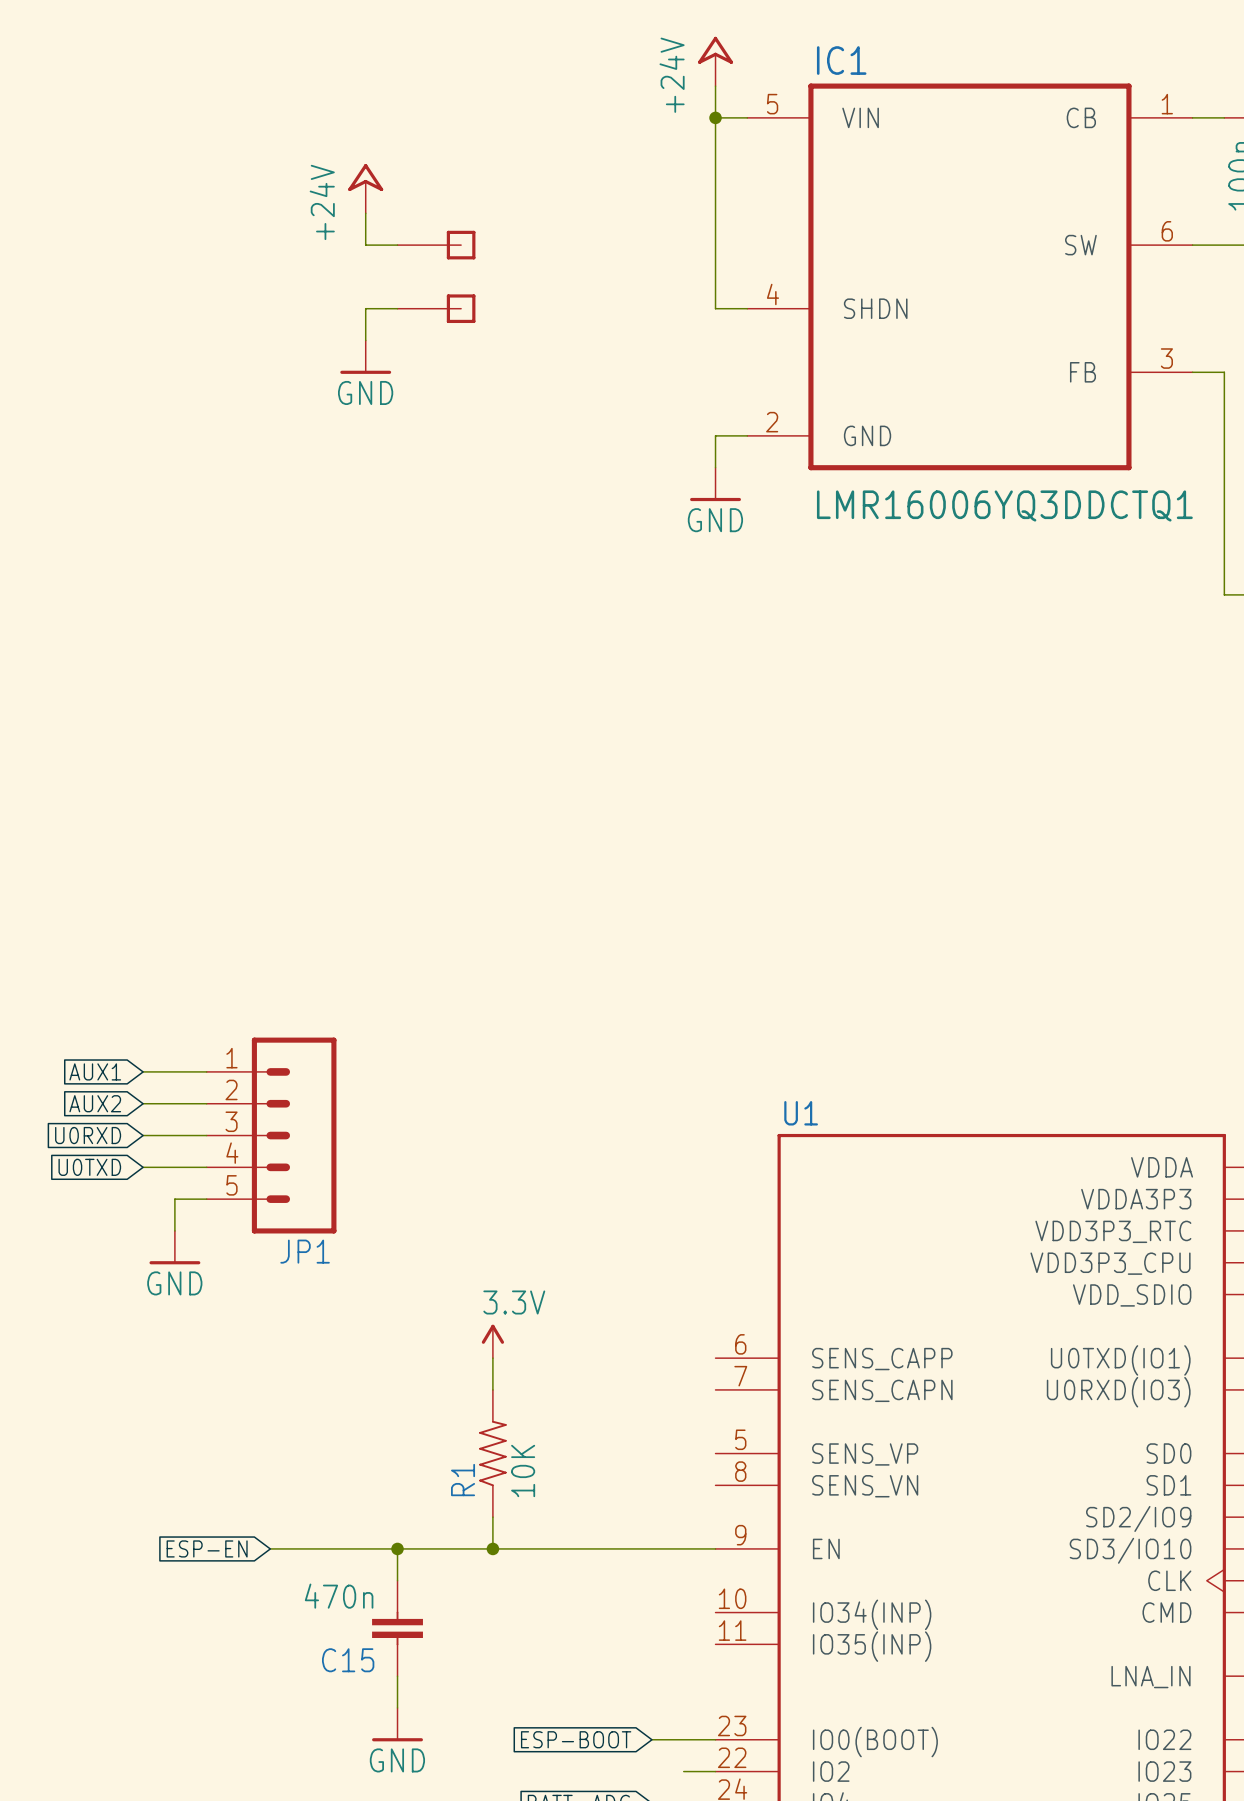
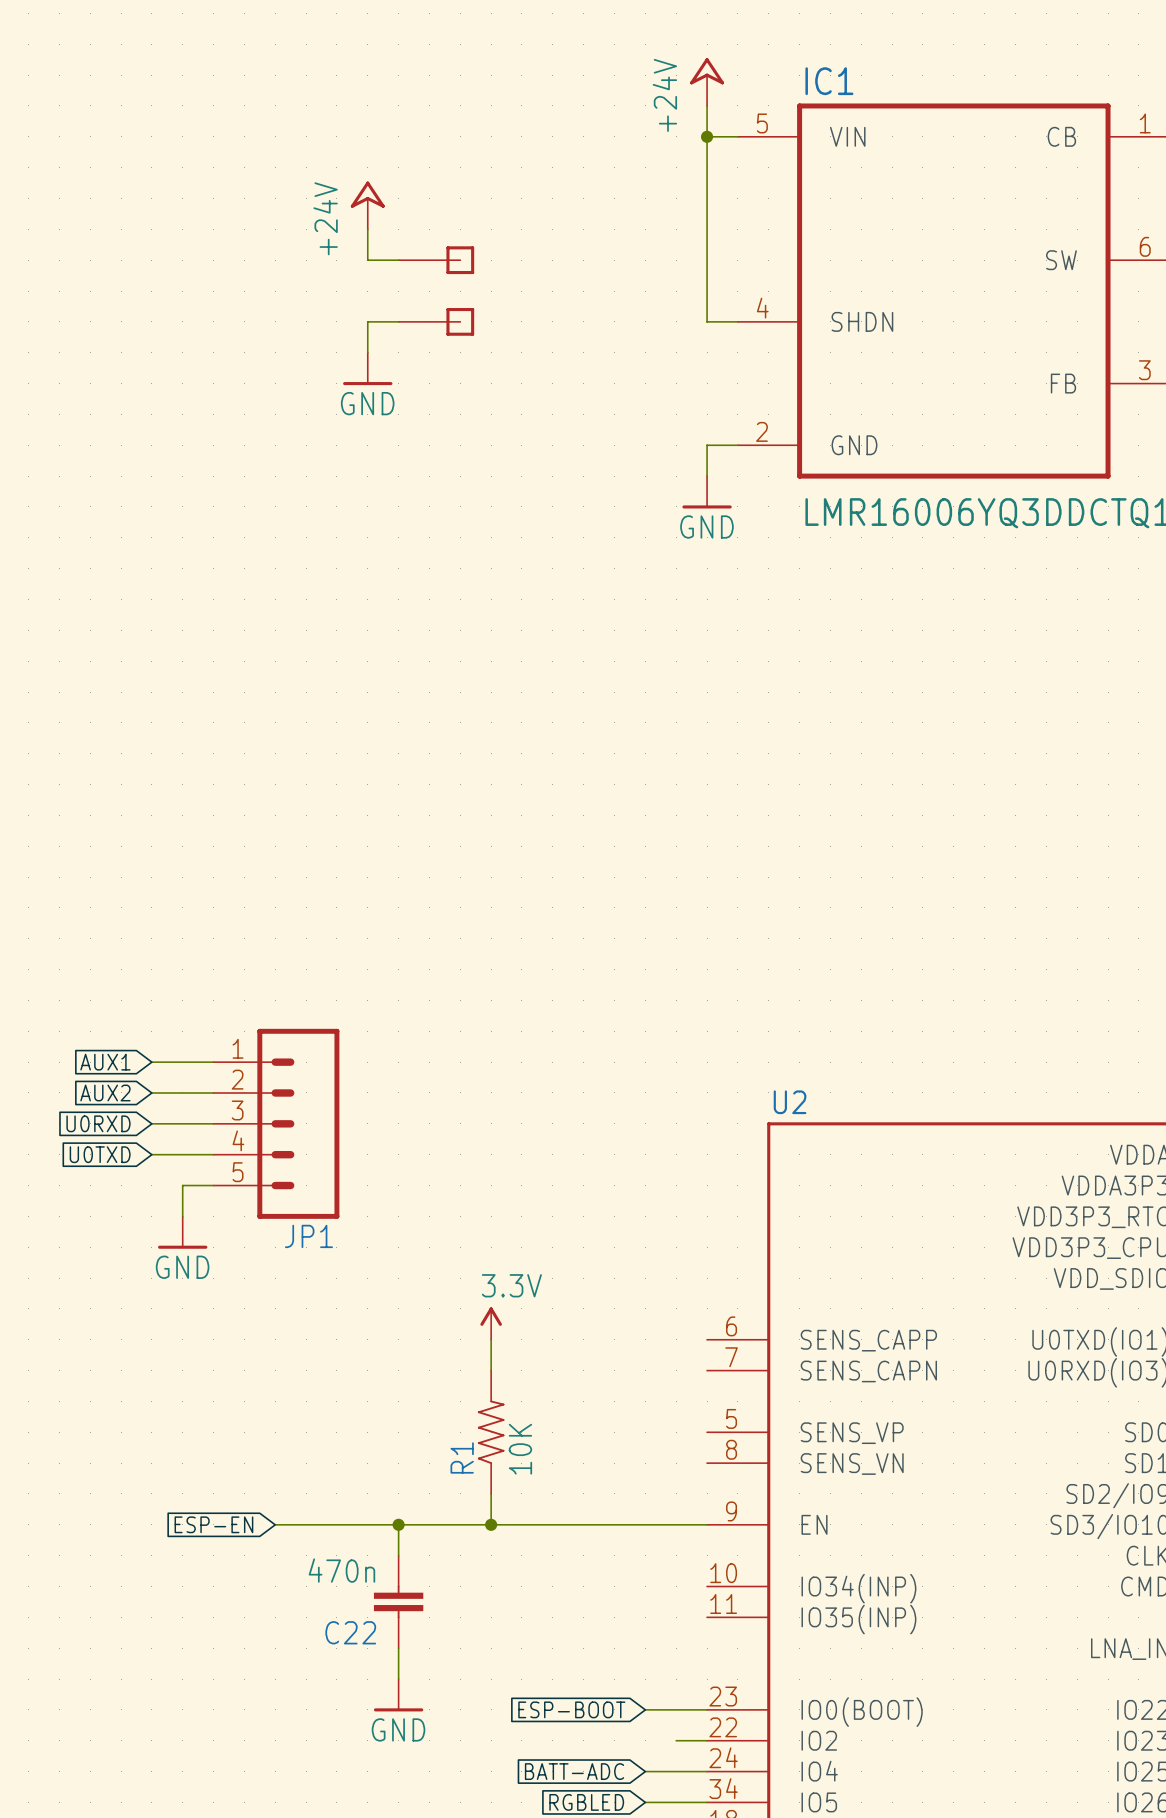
U1 name: U1 (801, 1113) -> U2 (790, 1102)
C15 name: C15 (348, 1660) -> C22 (350, 1632)

